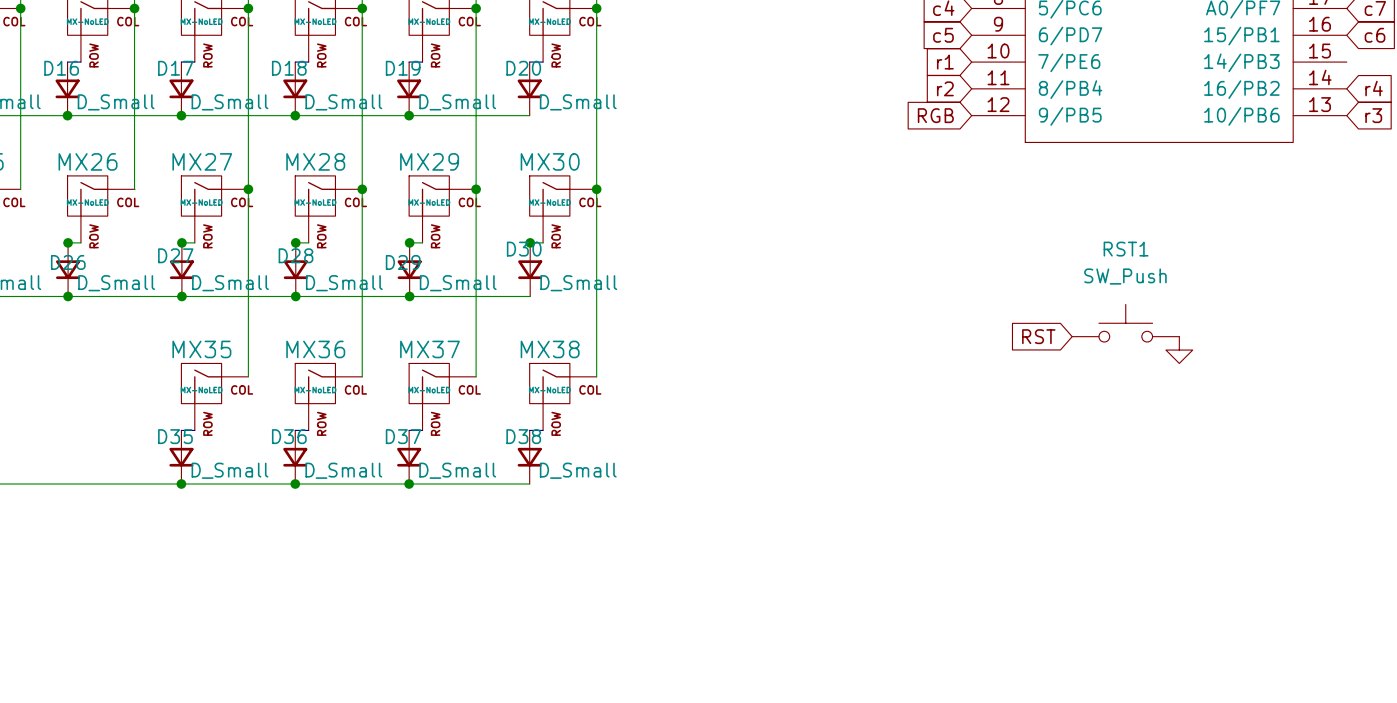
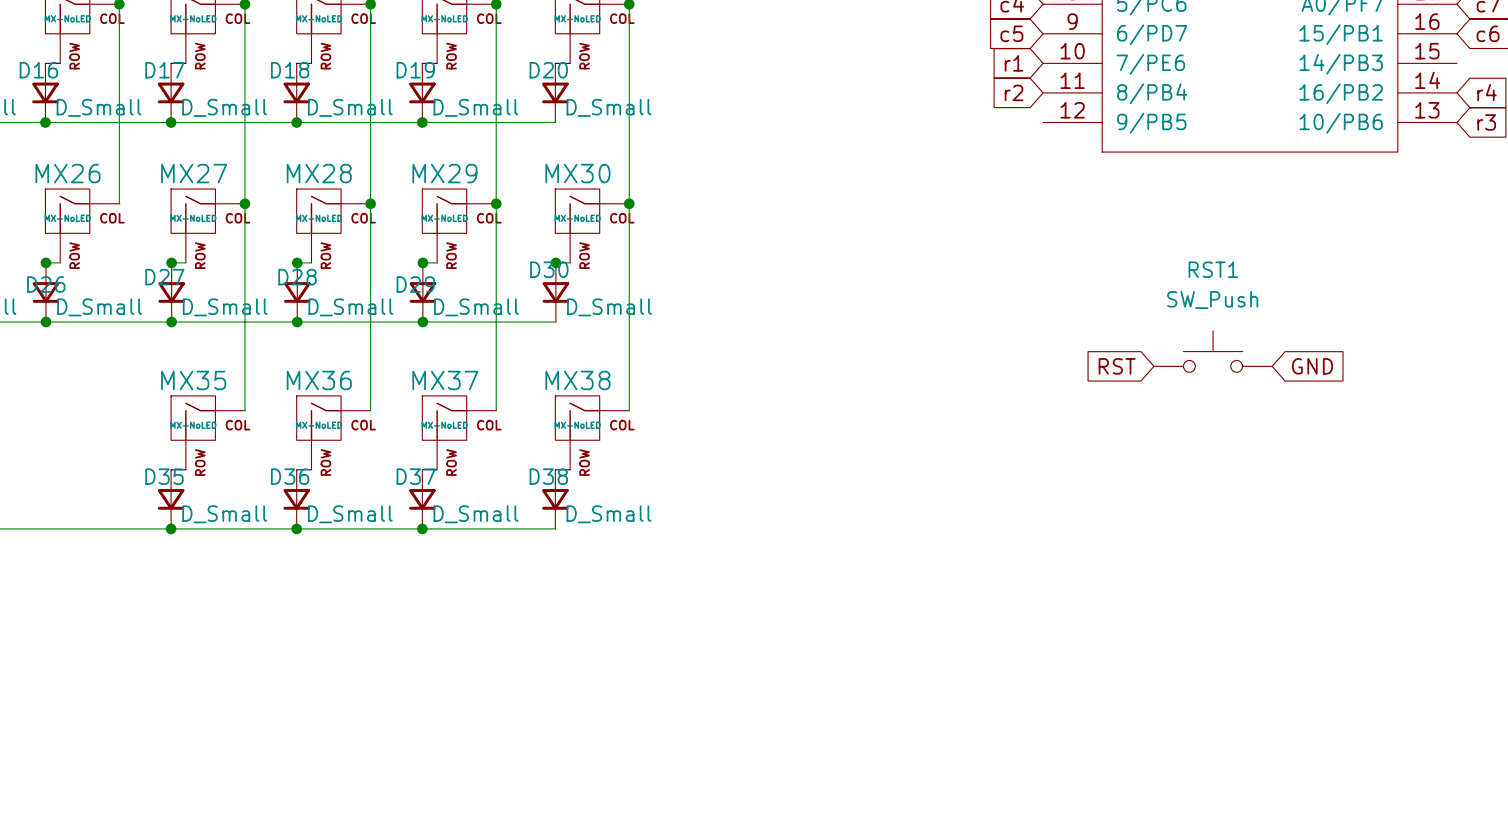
global label: RGB (935, 115) -> none
global label: none -> GND (1312, 366)
power symbol: (1179, 350) -> none

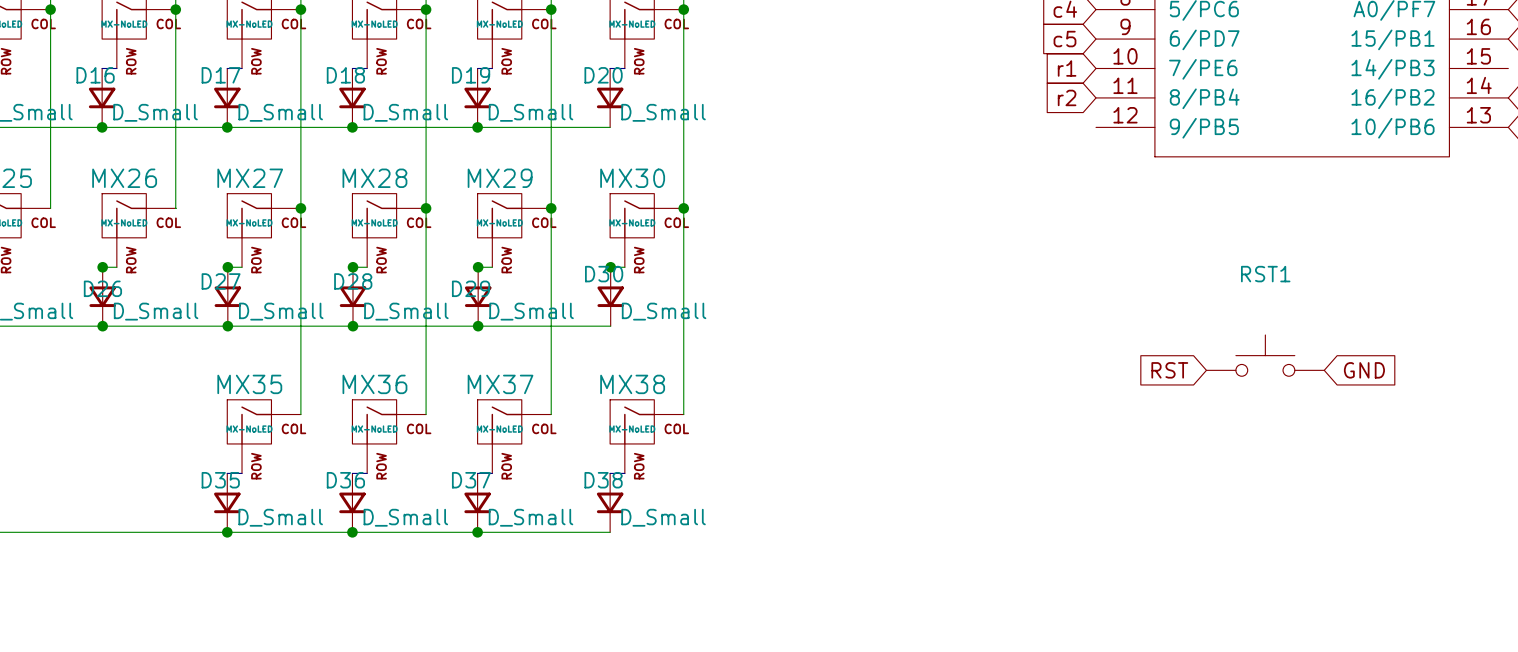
RST1 value: SW_Push (1212, 300) -> none

